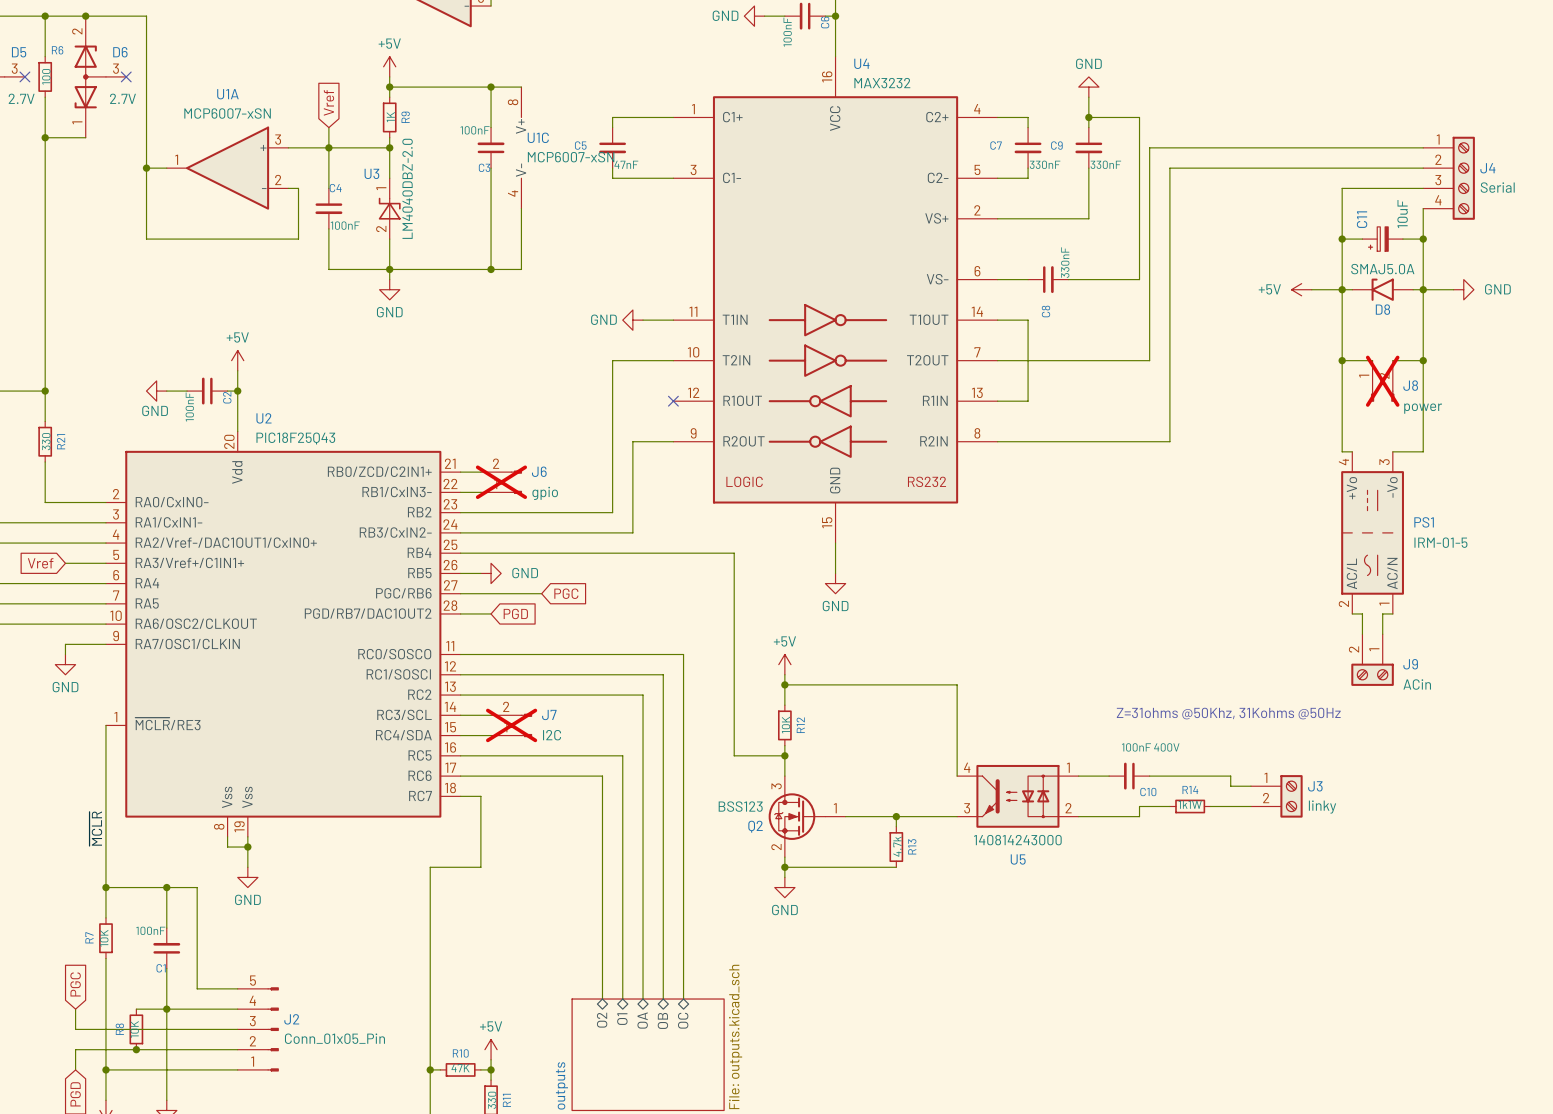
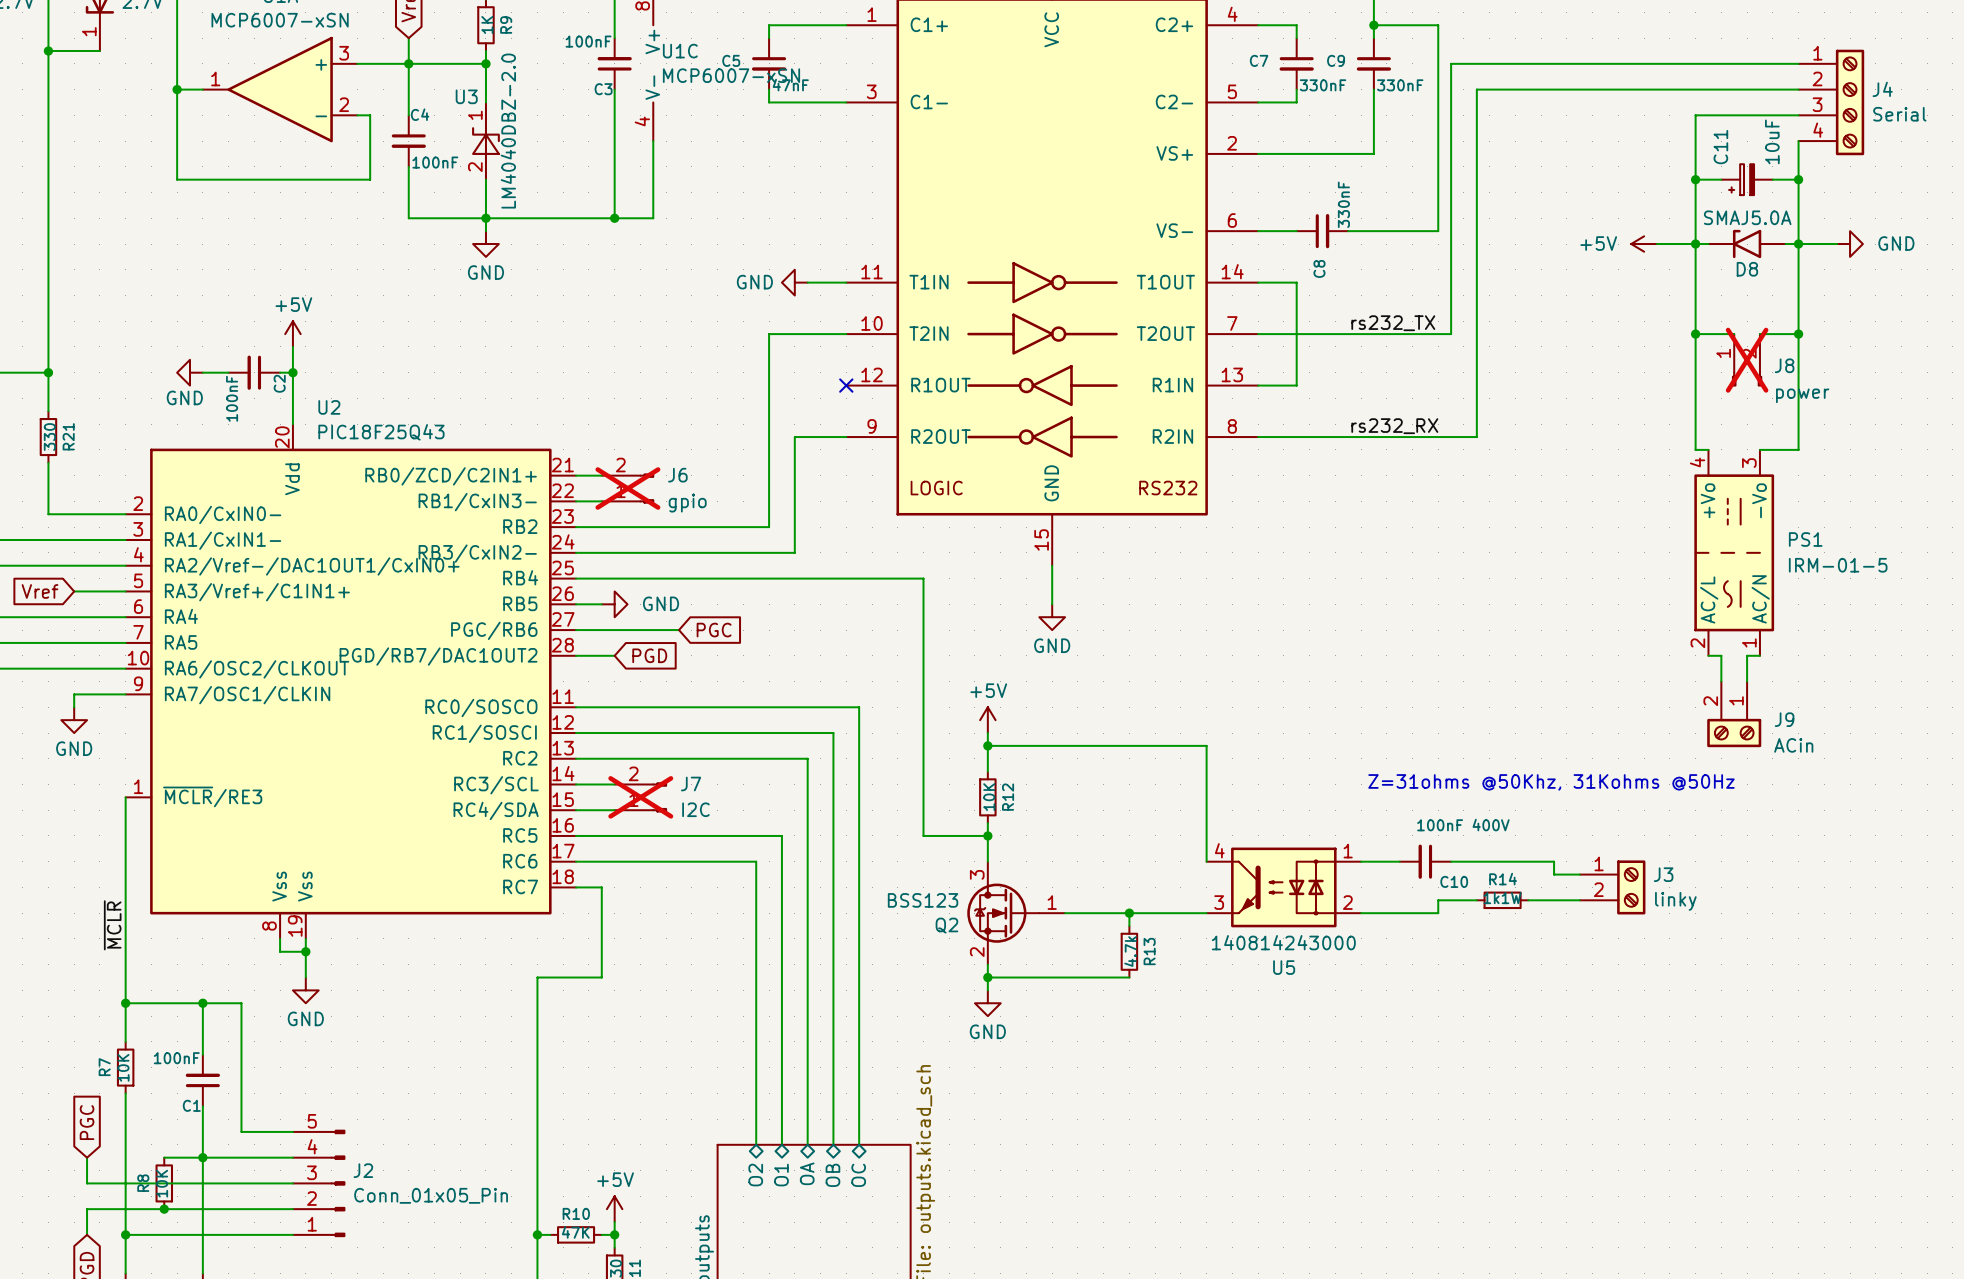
label: none -> rs232_TX (1393, 323)
label: none -> rs232_RX (1394, 426)

